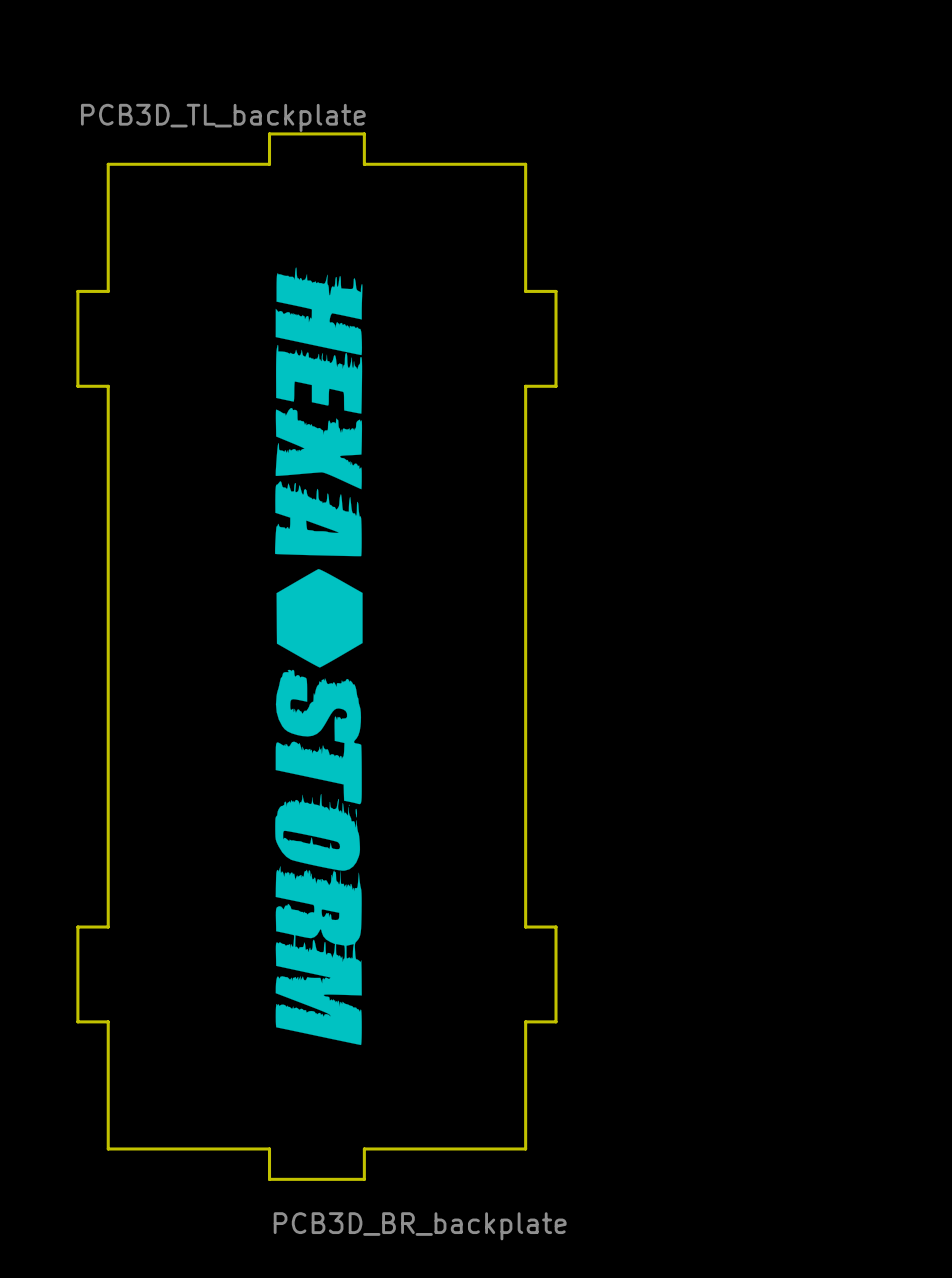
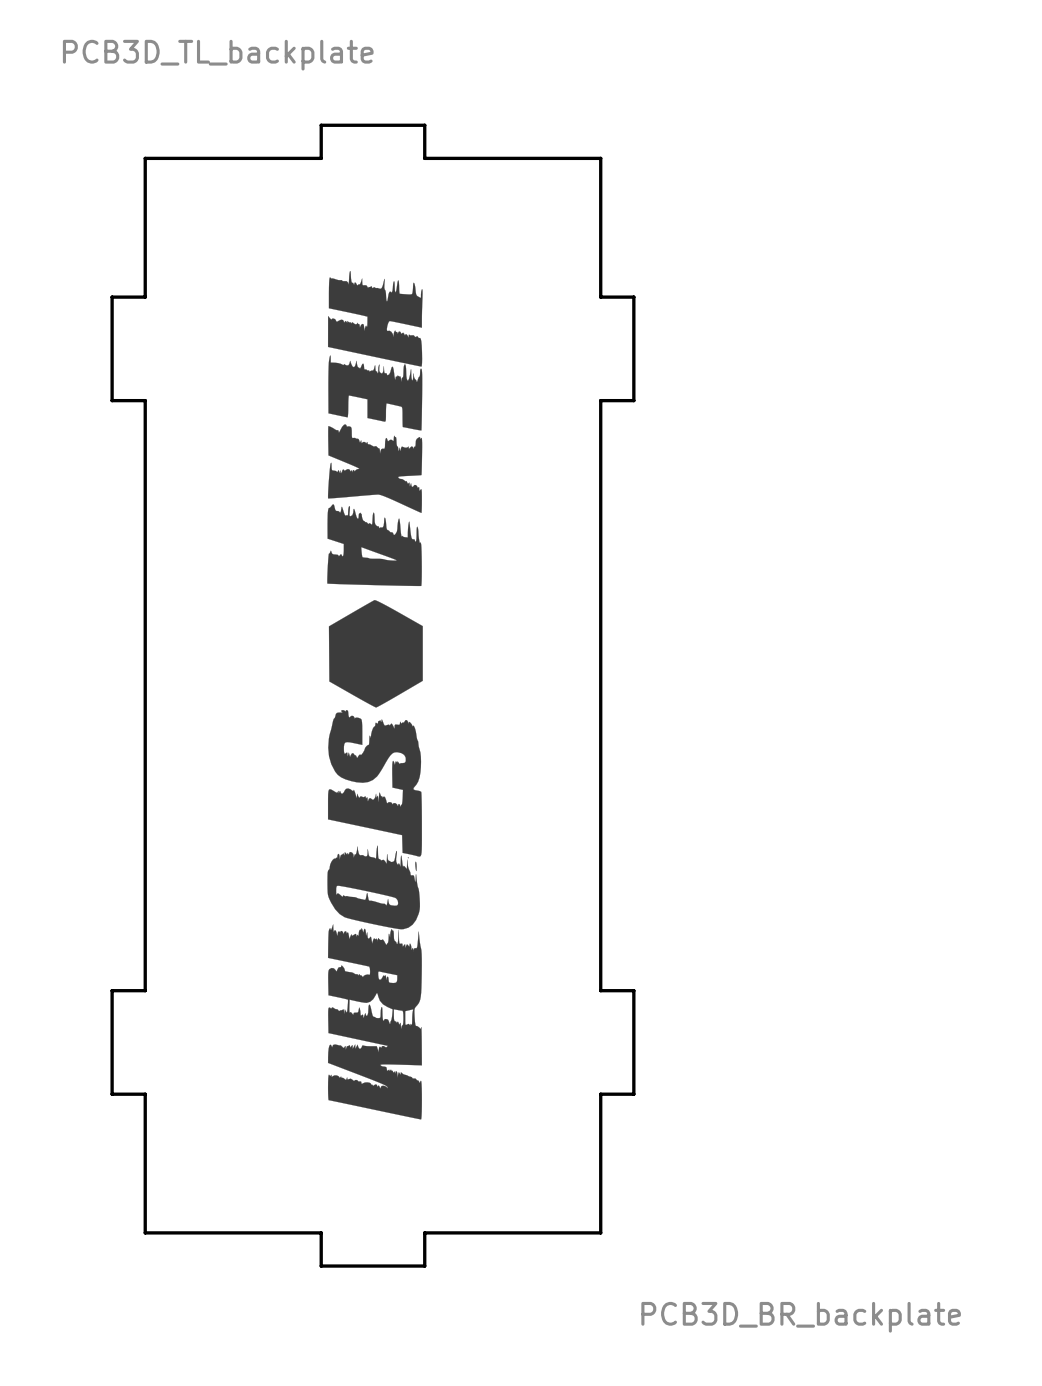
text position: PCB3D_TL_backplate (223, 117) -> PCB3D_TL_backplate (218, 55)
text position: PCB3D_BR_backplate (420, 1226) -> PCB3D_BR_backplate (801, 1317)

